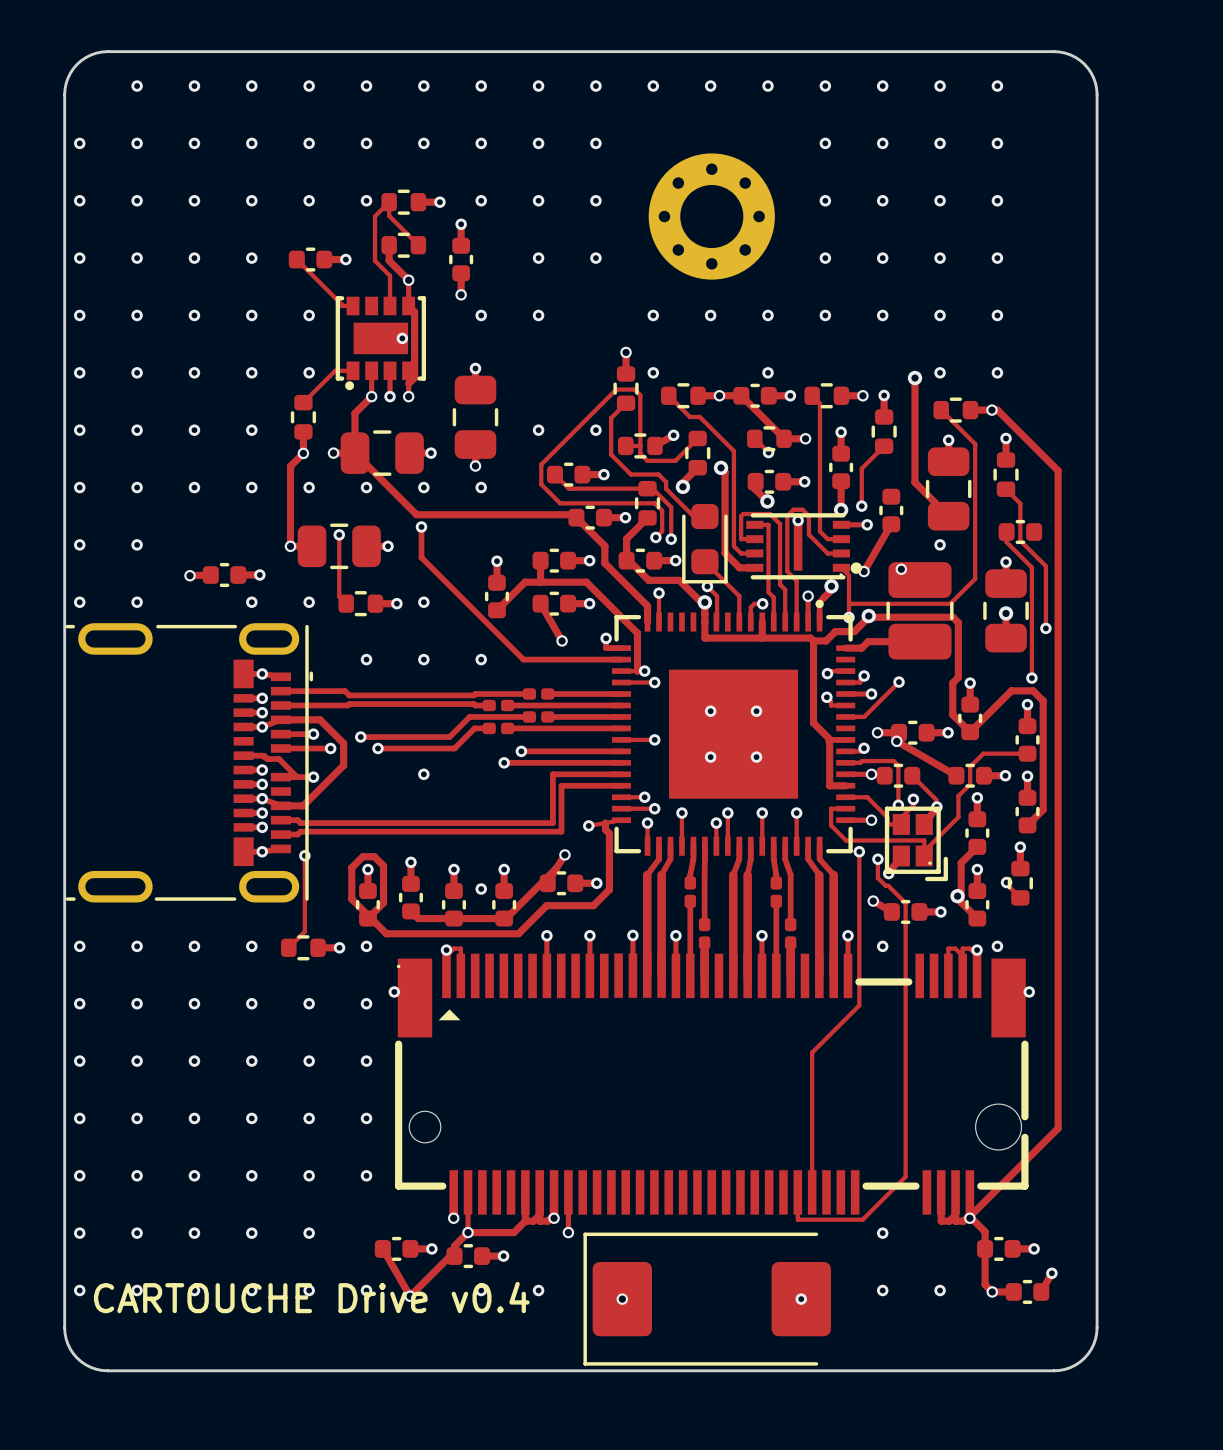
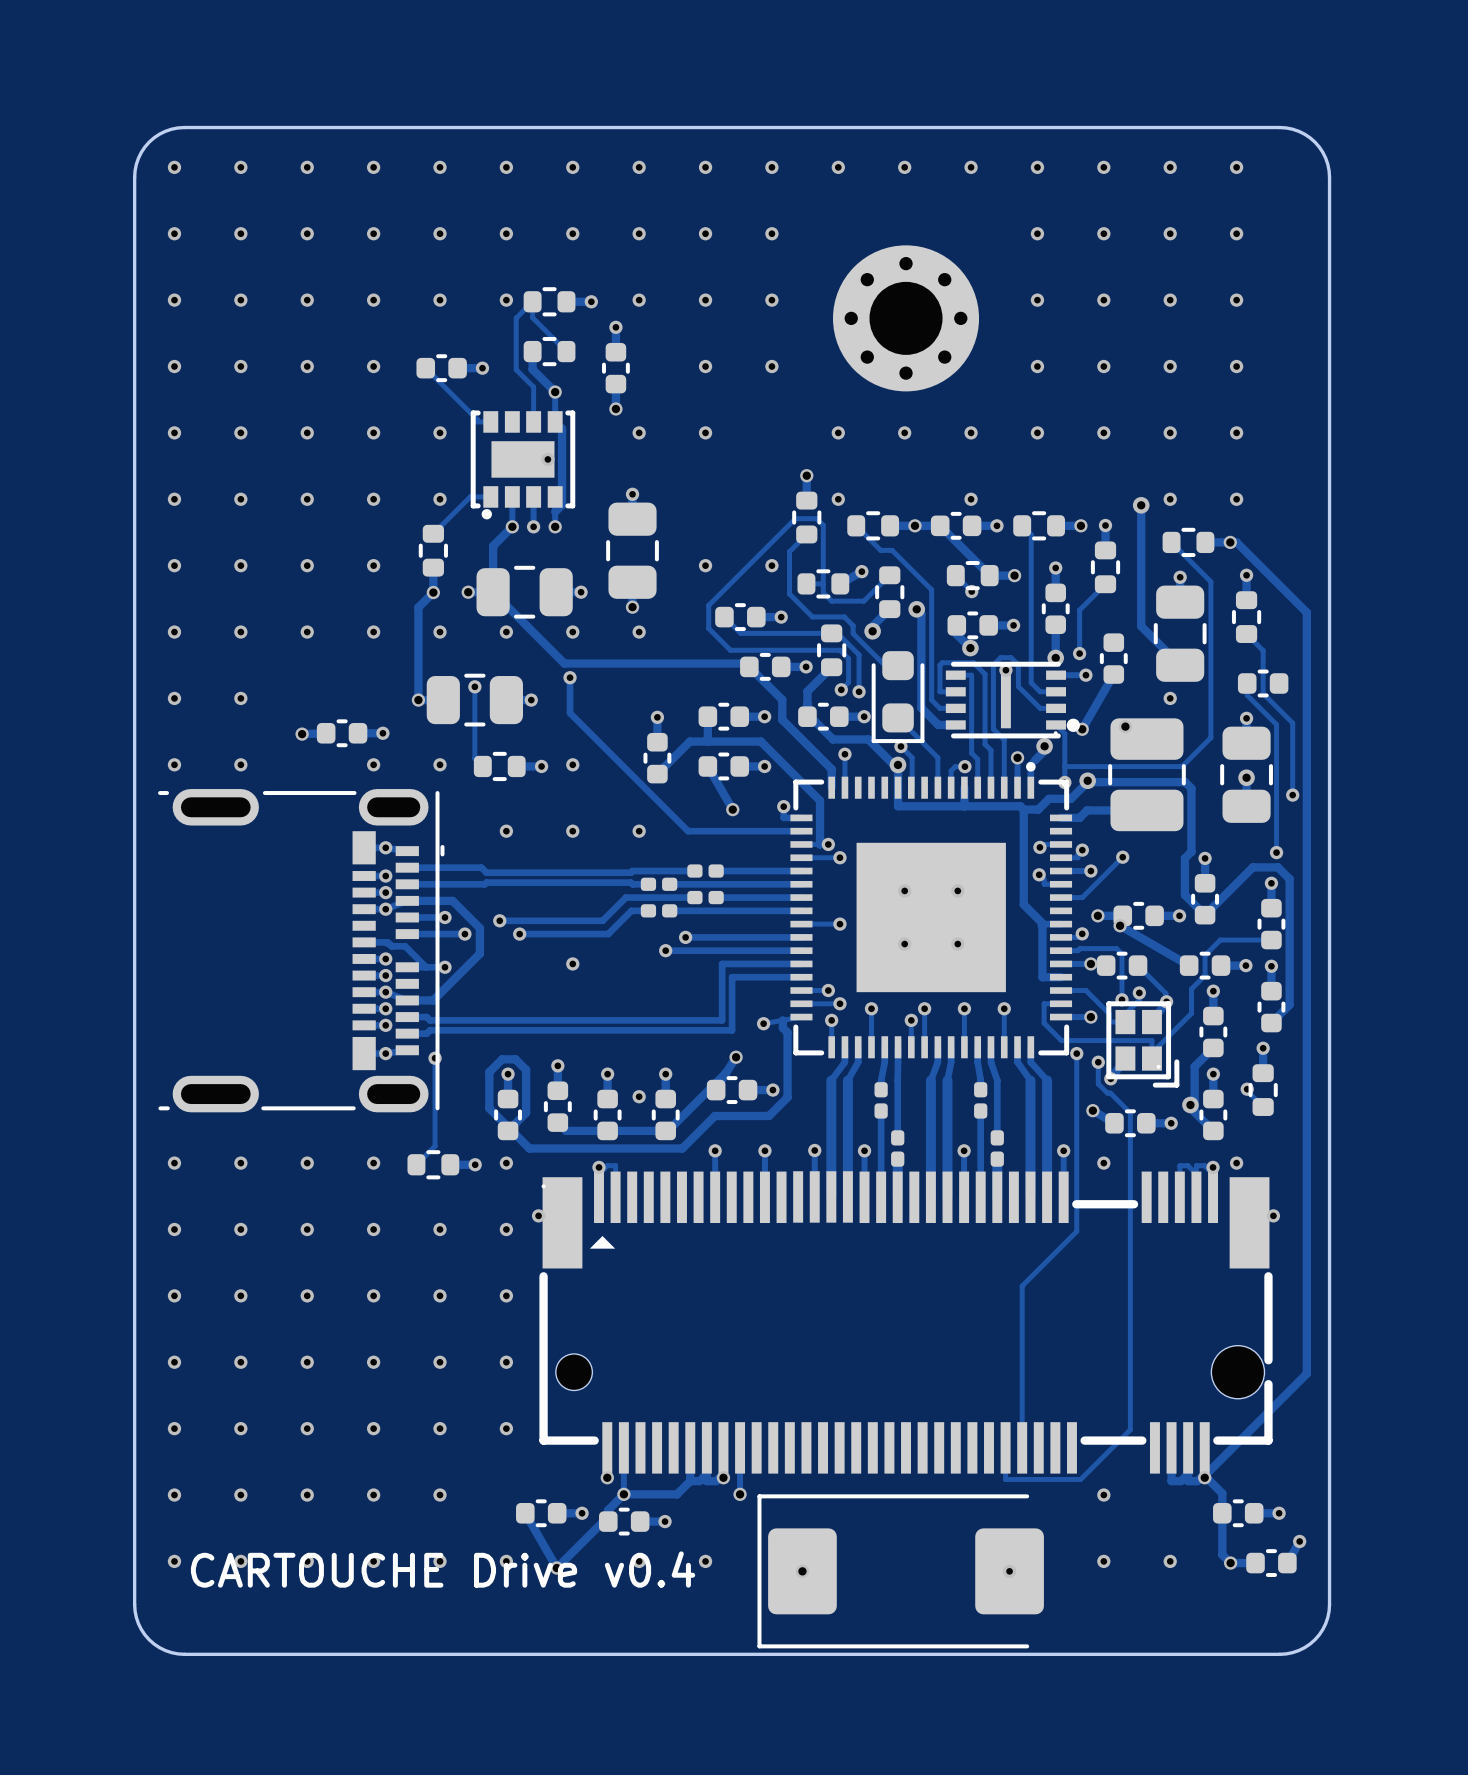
board edge: (107, 51) (91, 54) (77, 64) (67, 78) (64, 94) (64, 1327) (67, 1344) (77, 1358) (91, 1367) (107, 1370) -> (206, 127) (177, 127) (165, 131) (154, 137) (144, 147) (138, 158) (134, 177) (134, 1604) (136, 1617) (141, 1629) (154, 1644) (165, 1650) (177, 1653) (206, 1654)
board edge: (1034, 51) (1059, 52) (1080, 60) (1091, 73) (1097, 94) (1097, 1327) (1091, 1349) (1080, 1361) (1059, 1370) (1034, 1370) -> (1279, 127) (1298, 131) (1314, 142) (1325, 158) (1329, 177) (1329, 1604) (1325, 1623) (1314, 1639) (1298, 1650) (1279, 1654)
via: none -> (174, 167)

